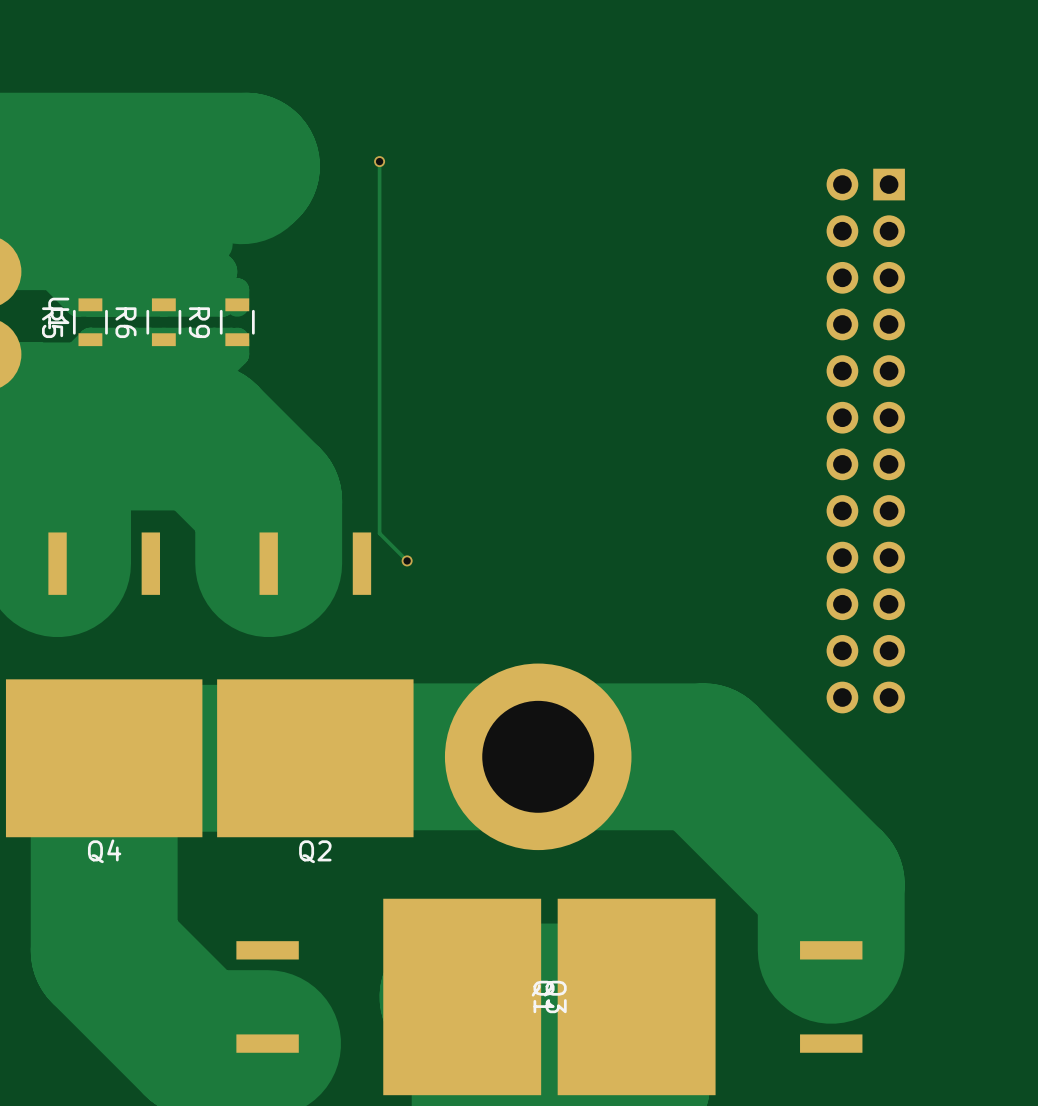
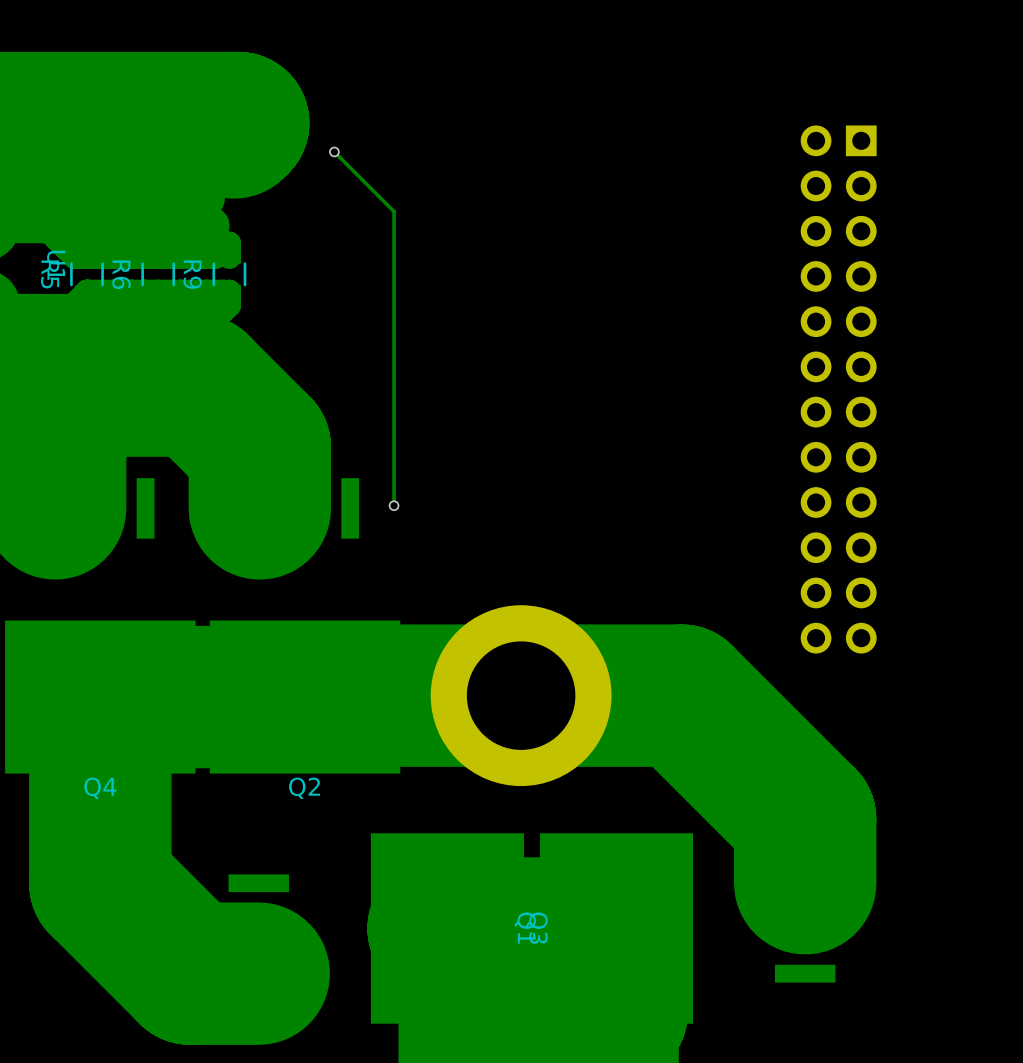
track: (379, 161) (379, 533) (407, 560) -> (334, 151) (394, 211) (394, 505)
via position: (379, 161) -> (334, 151)

